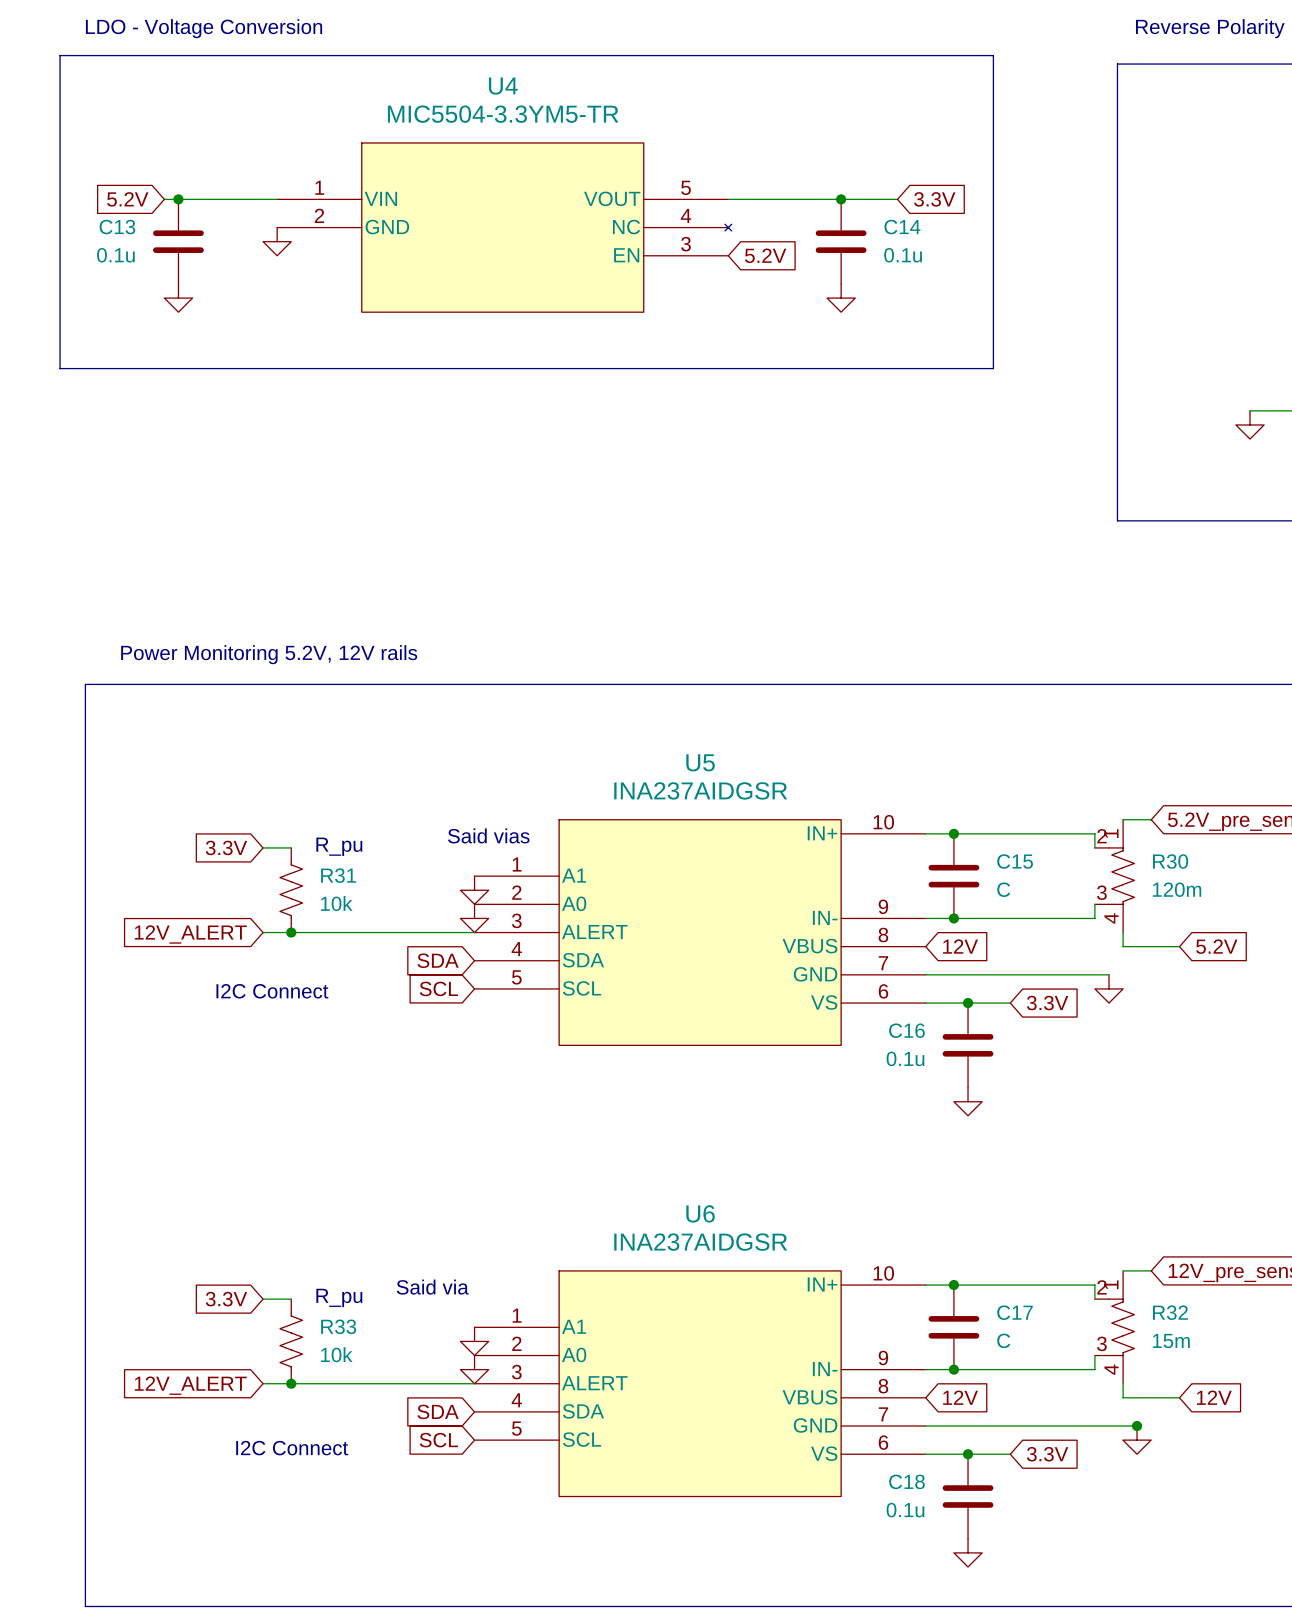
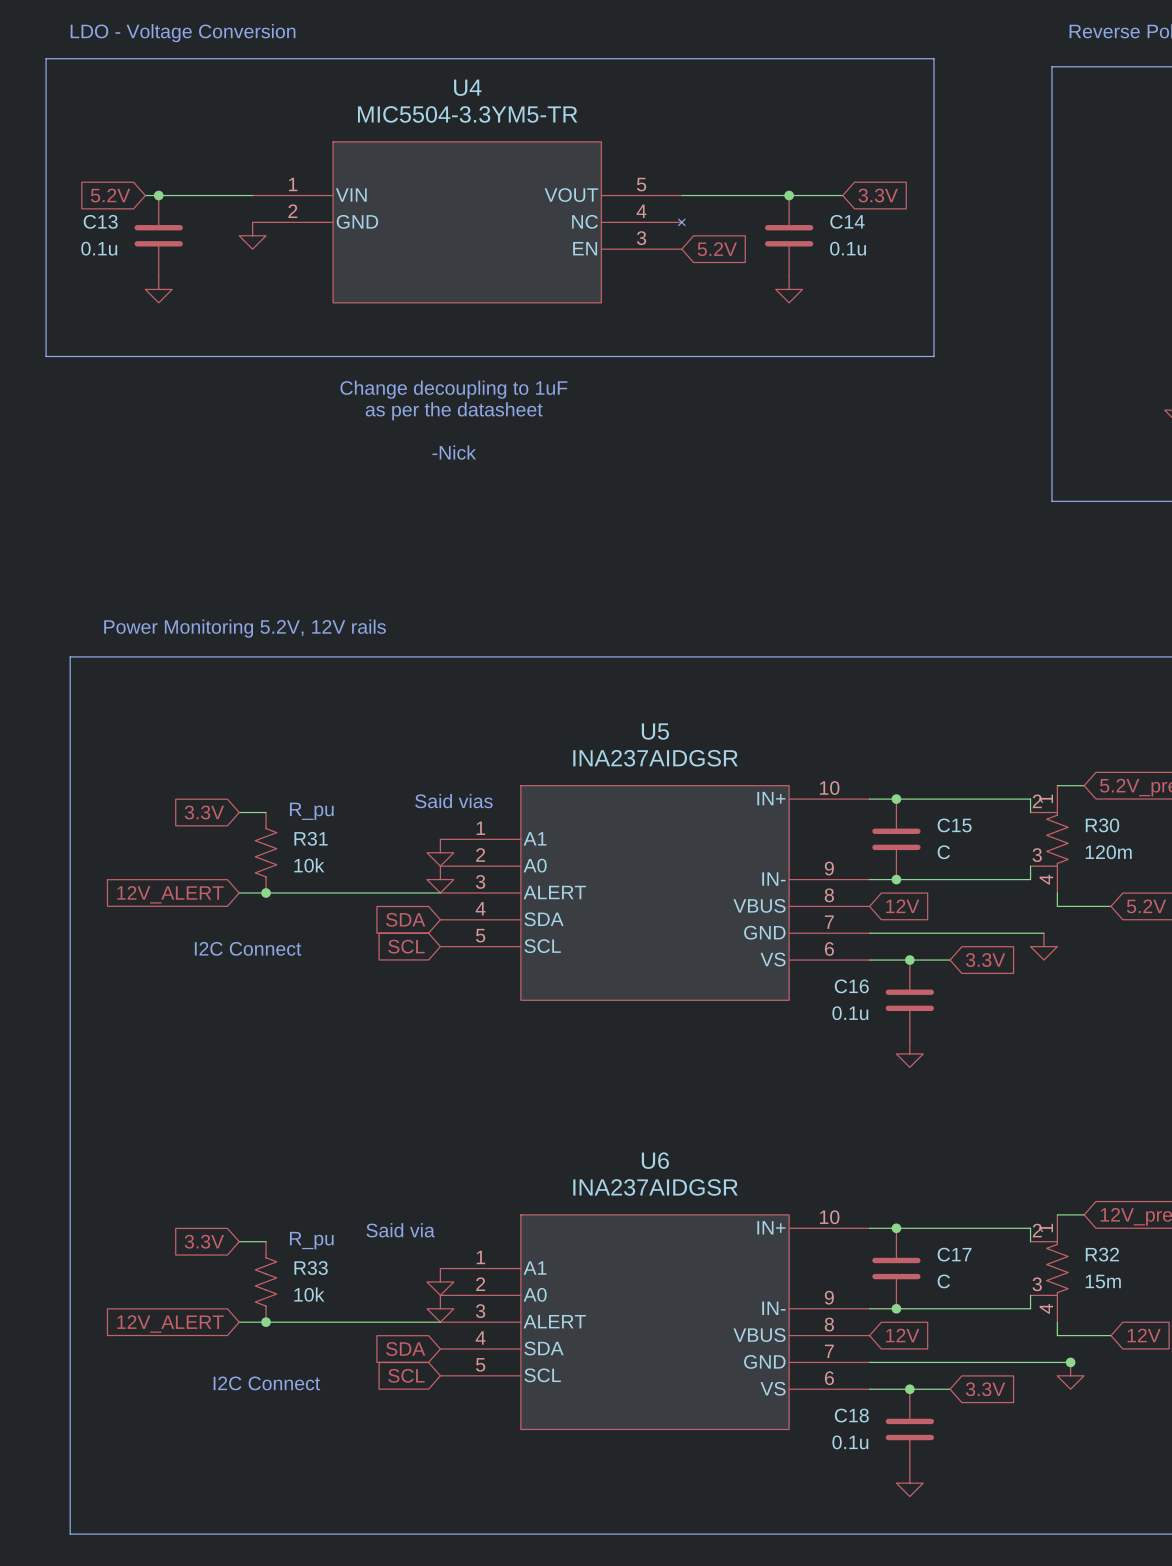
text: none -> Change decoupling to 1uF (453, 389)
text: none -> as per the datasheet (454, 411)
text: none -> -Nick (454, 452)

